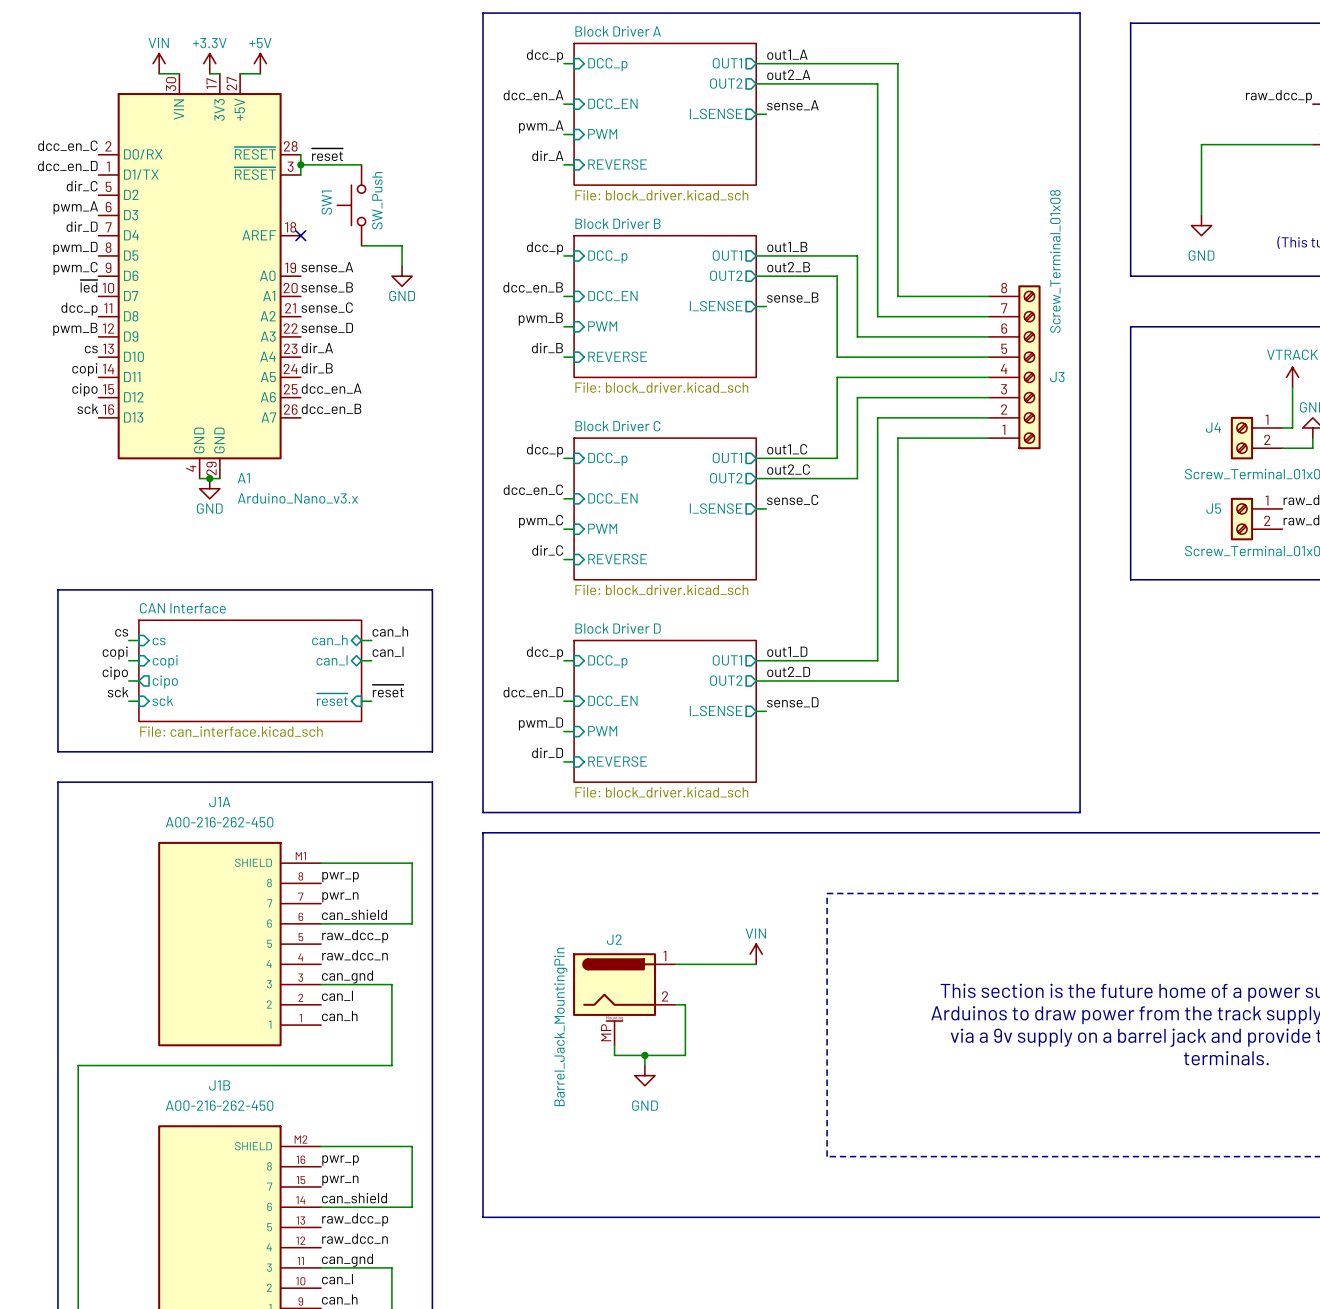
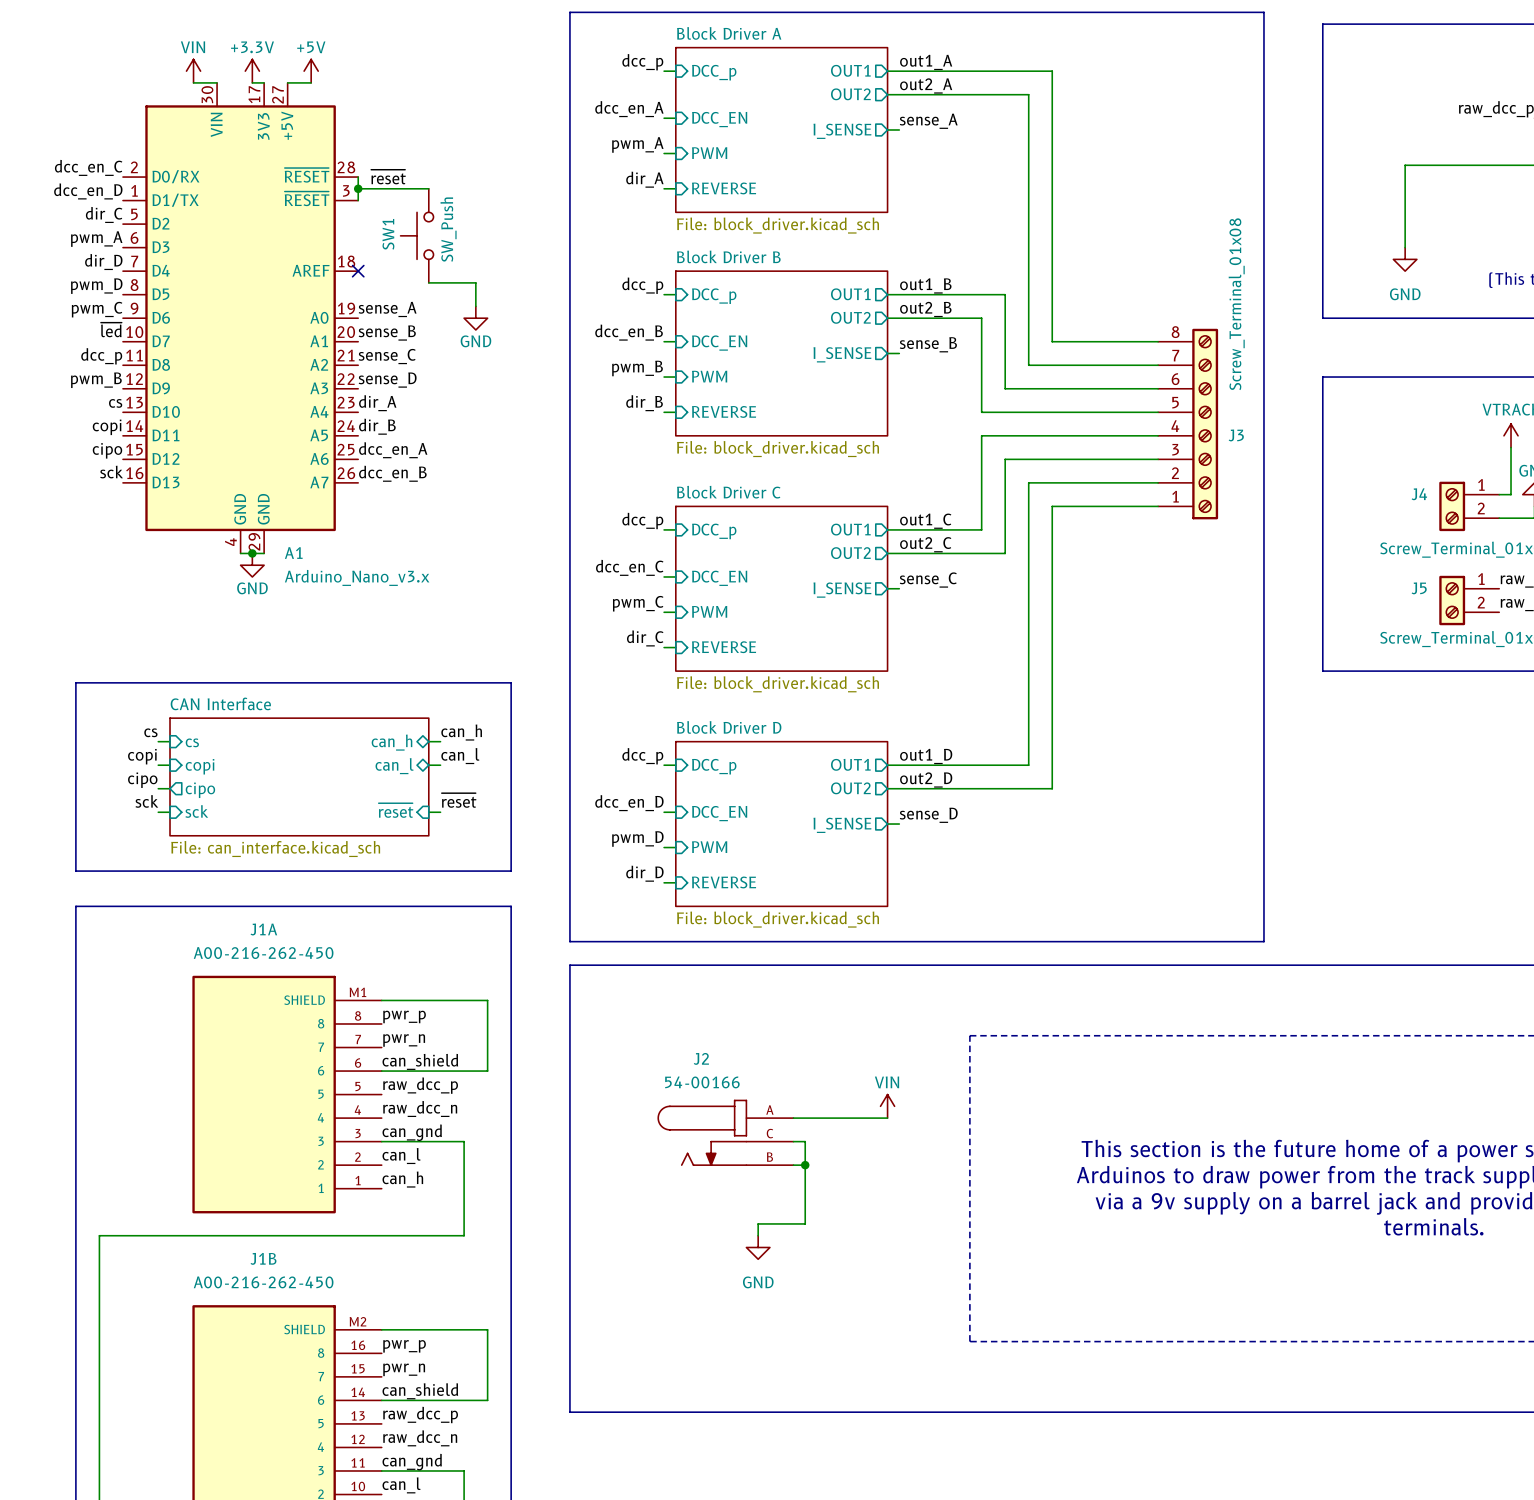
J2 symbol: [573, 953, 676, 1046] -> [657, 1099, 794, 1166]
wire: none -> (793, 1141) (805, 1141) (805, 1165)
junction: none -> (805, 1165)
J2 value: Barrel_Jack_MountingPin (560, 1026) -> 54-00166 (702, 1082)
wire: (614, 1045) (614, 1055) (644, 1055) -> none
junction: (644, 1055) -> none

